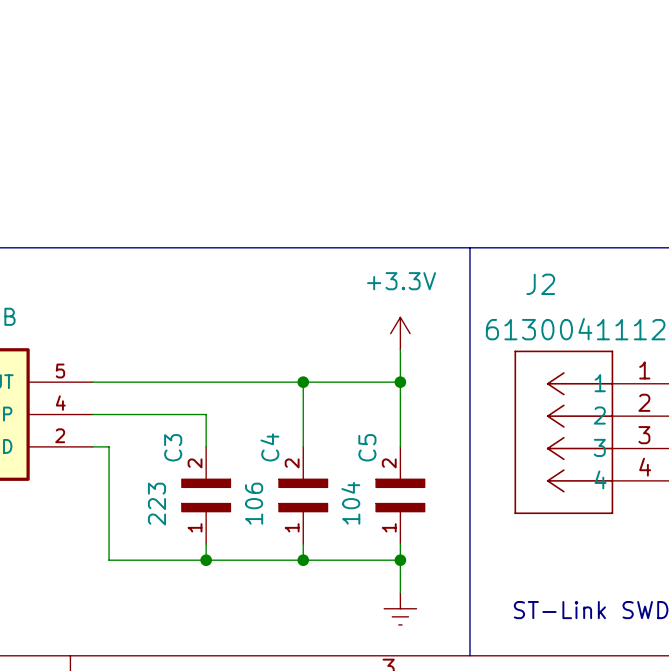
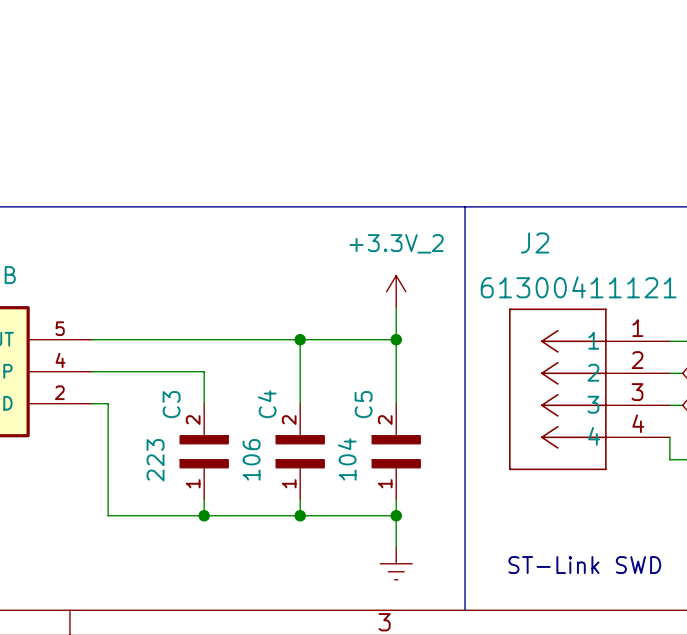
power symbol: +3.3V (400, 333) -> +3.3V_2 (396, 291)

